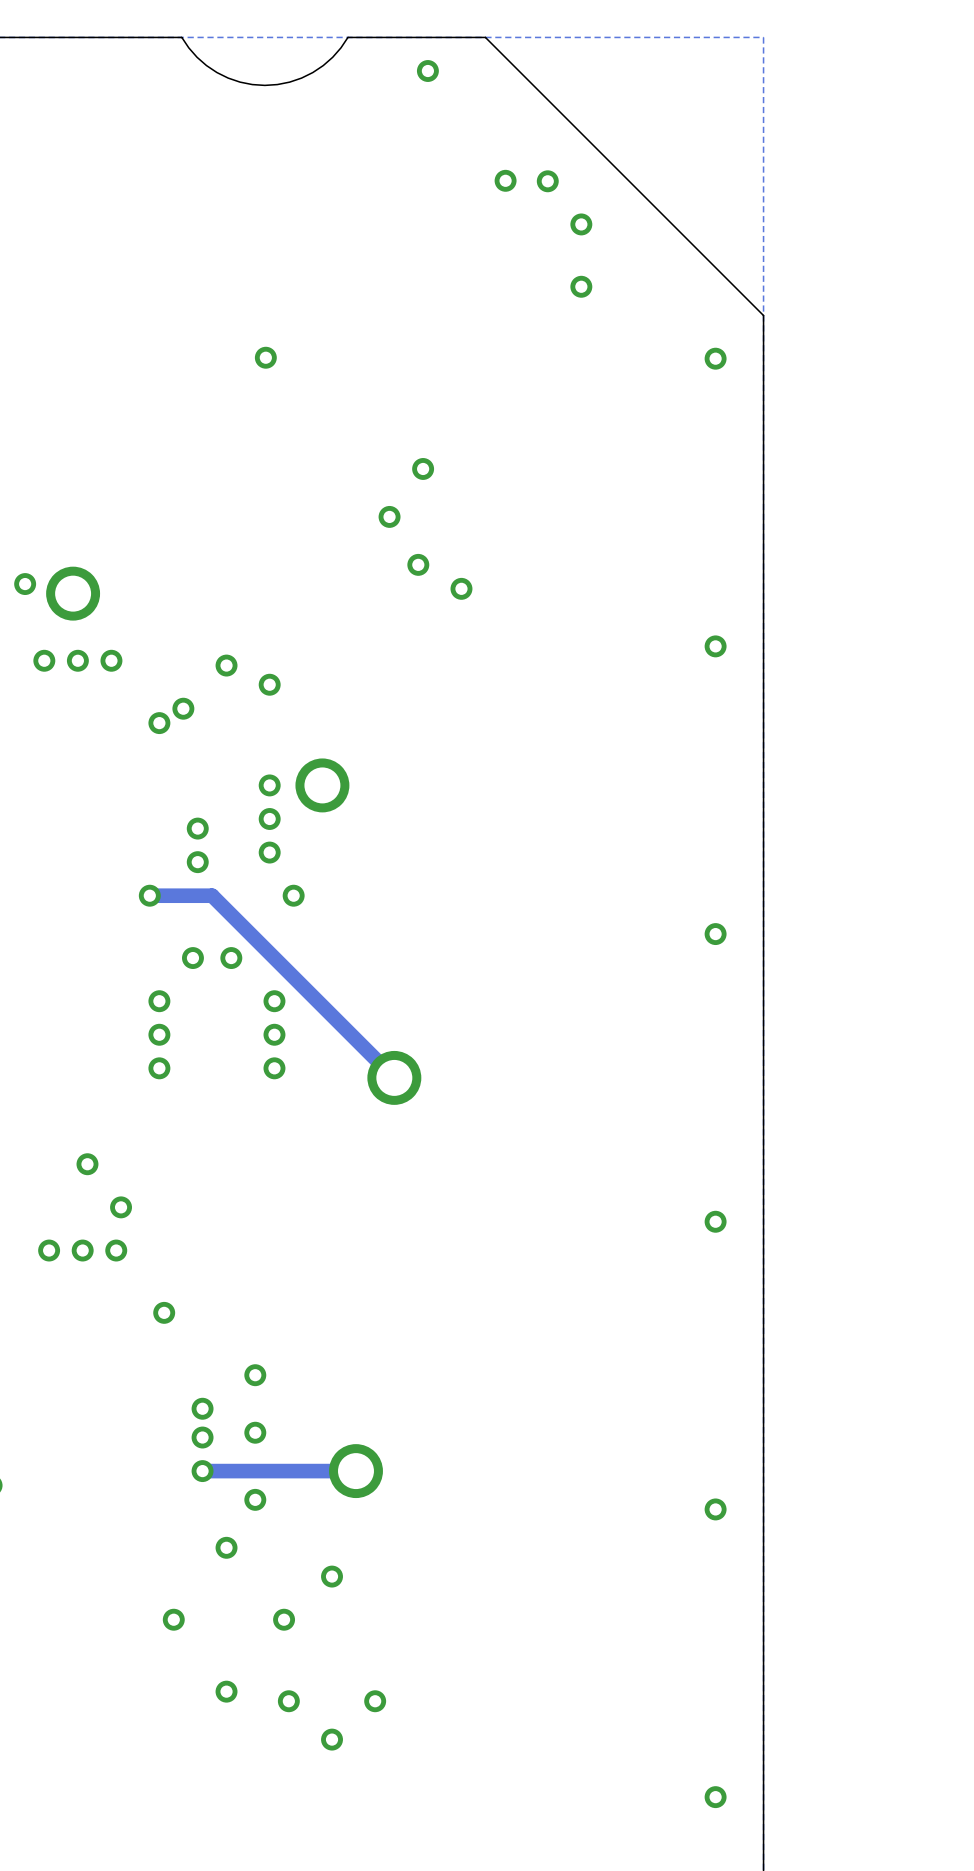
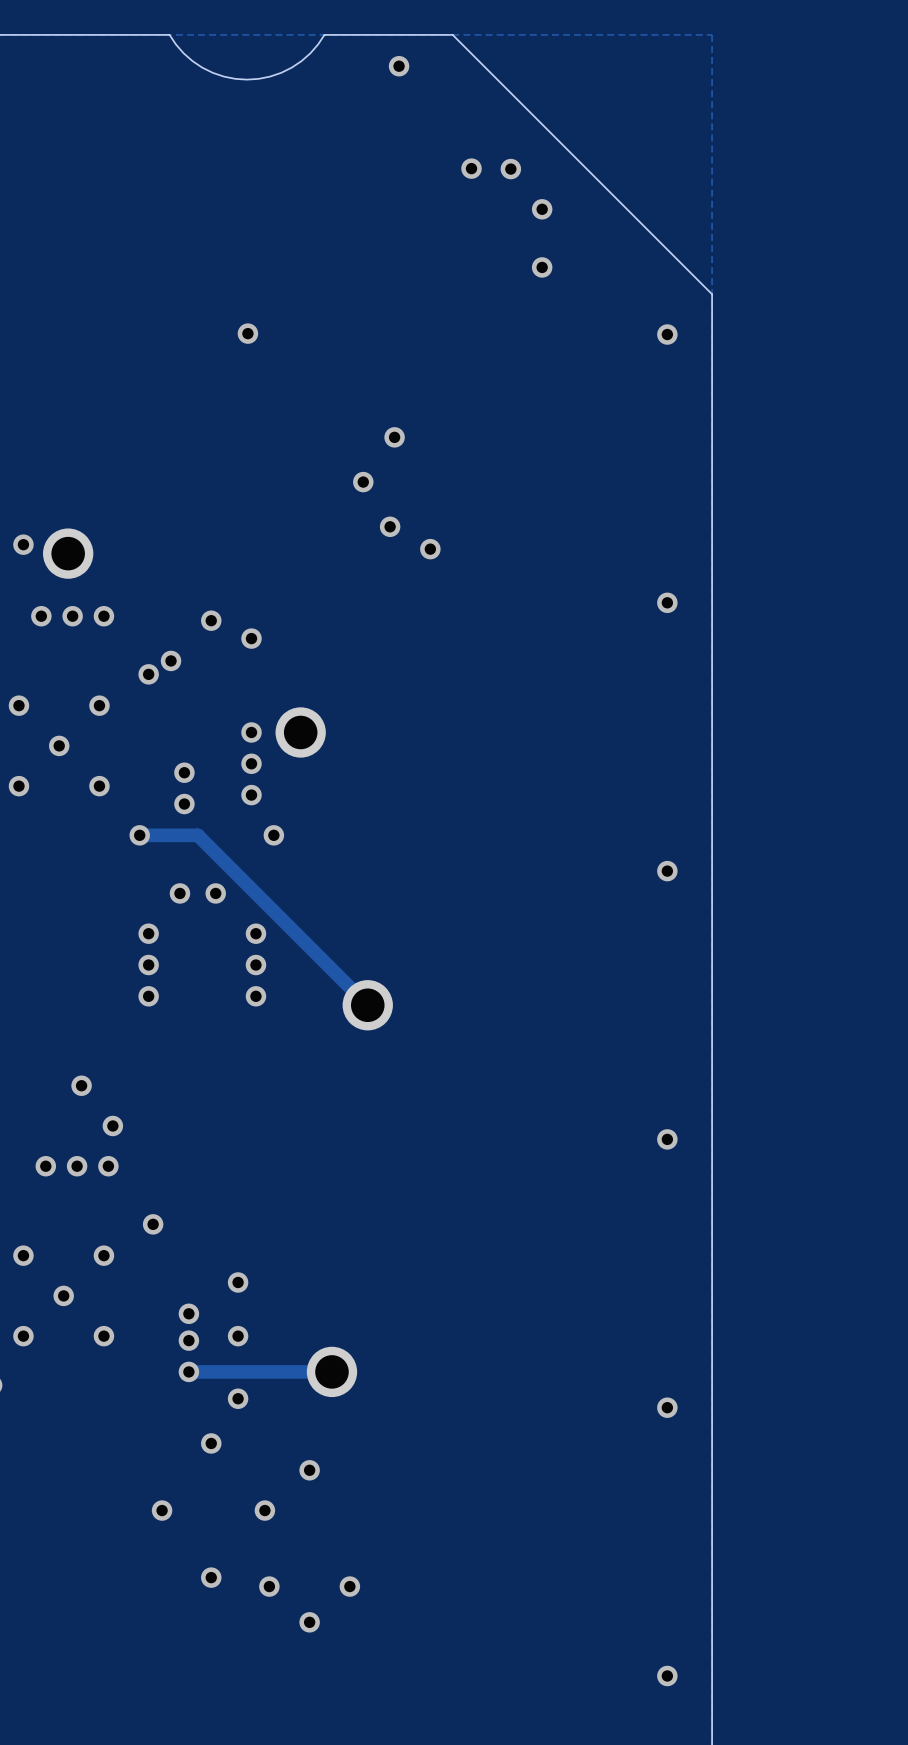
via: none -> (18, 705)
via: none -> (99, 705)
via: none -> (59, 745)
via: none -> (18, 786)
via: none -> (99, 786)
via: none -> (23, 1255)
via: none -> (103, 1255)
via: none -> (63, 1295)
via: none -> (23, 1336)
via: none -> (103, 1336)

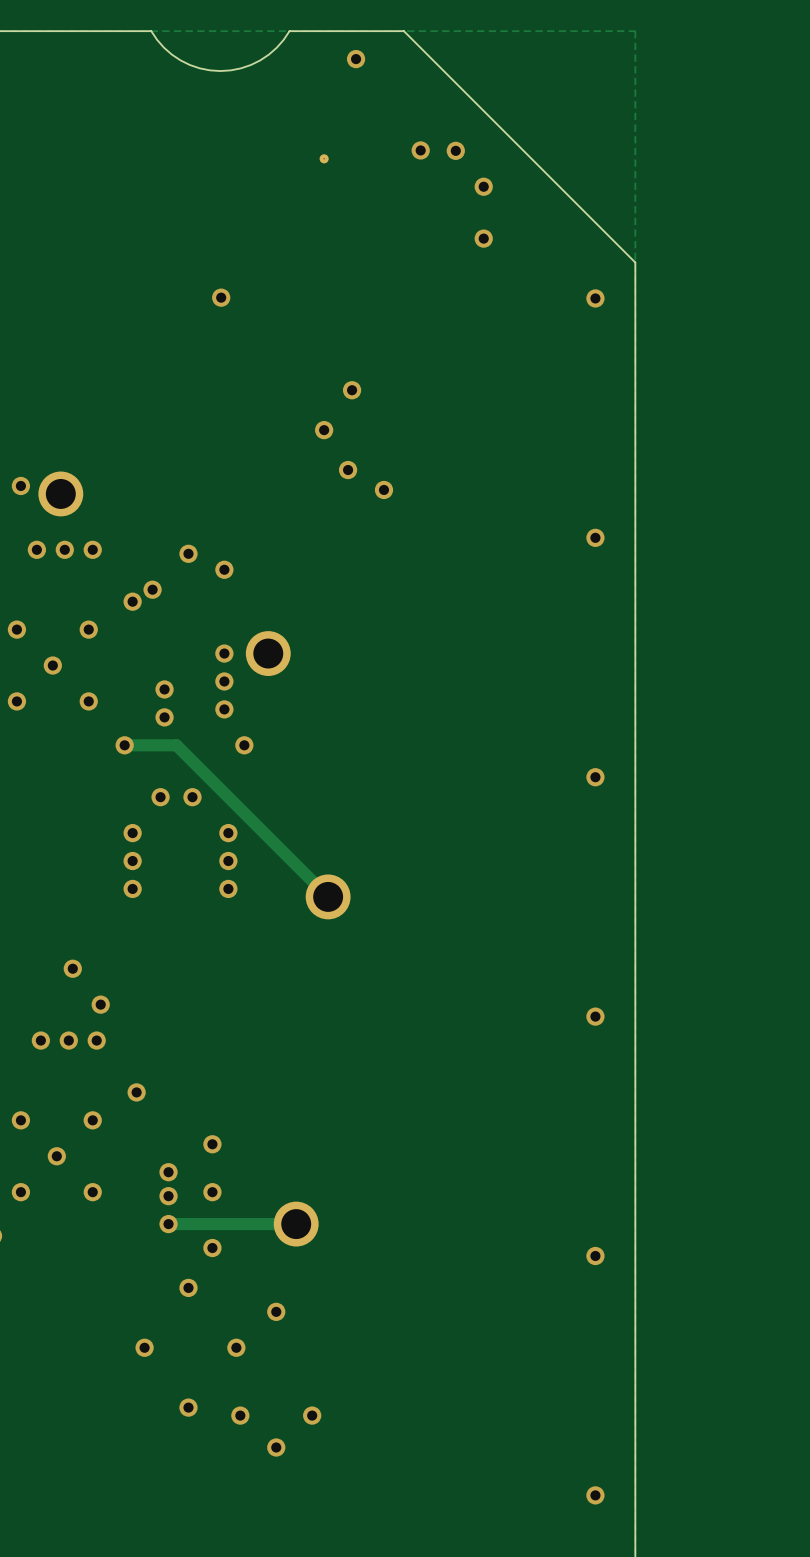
part: none -> (324, 158)

